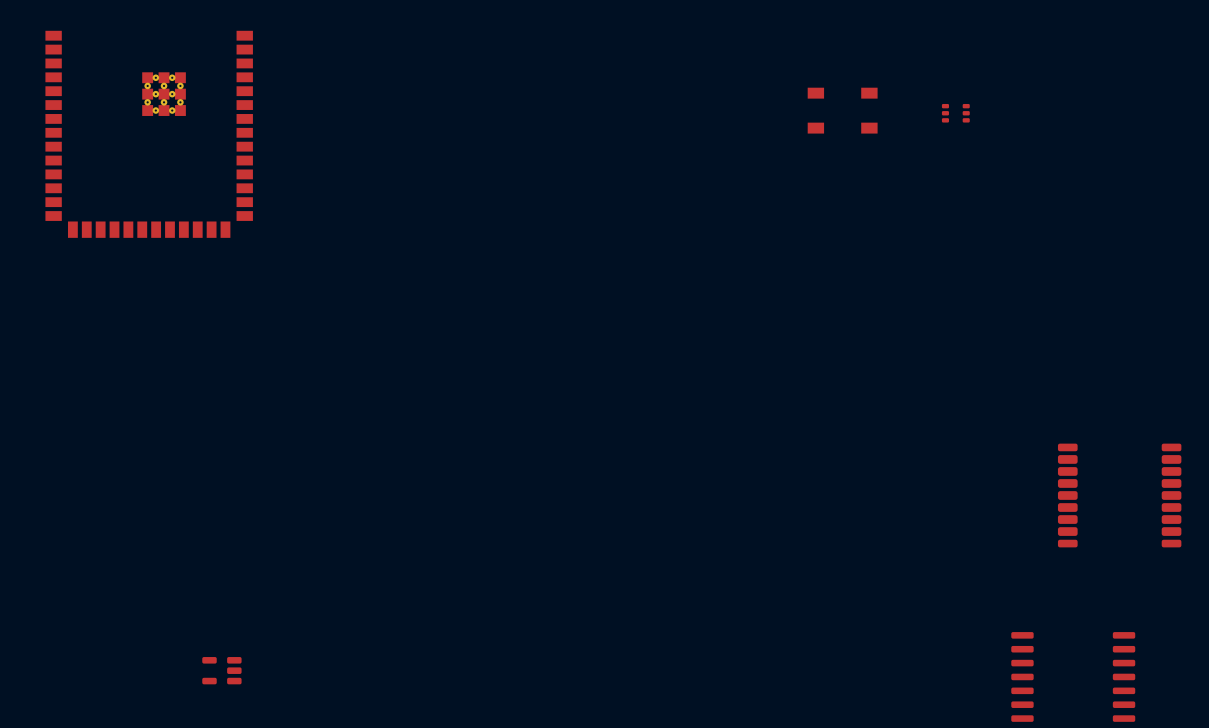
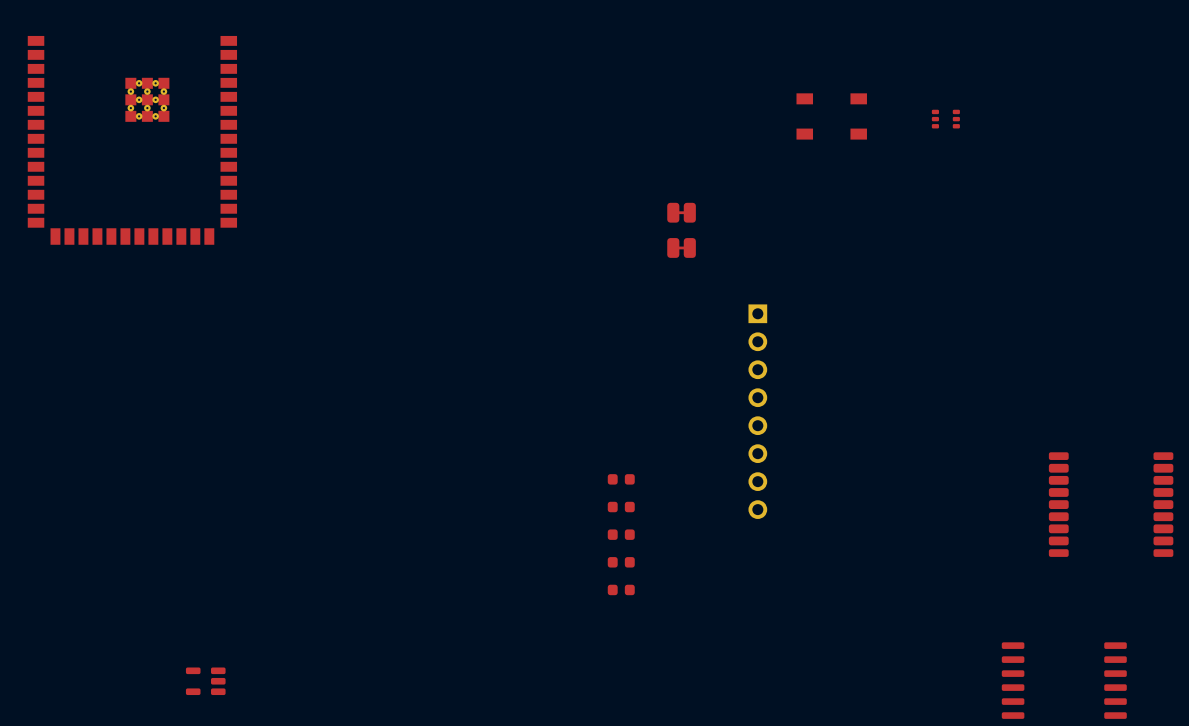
part: none -> (681, 212)
part: none -> (681, 247)
part: none -> (757, 411)
part: none -> (621, 479)
part: none -> (621, 507)
part: none -> (621, 534)
part: none -> (621, 562)
part: none -> (621, 589)

